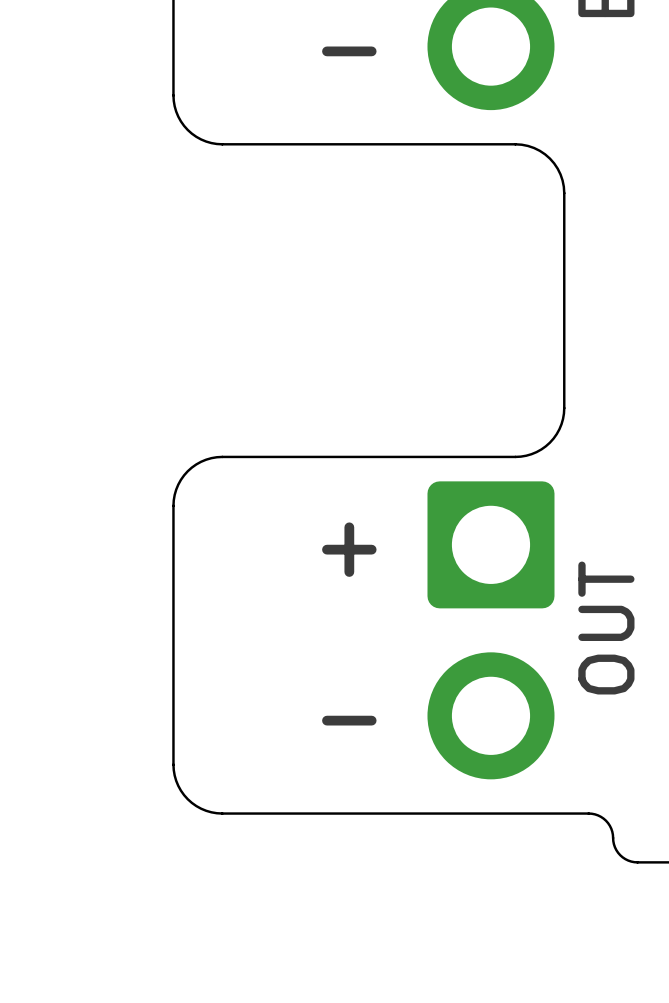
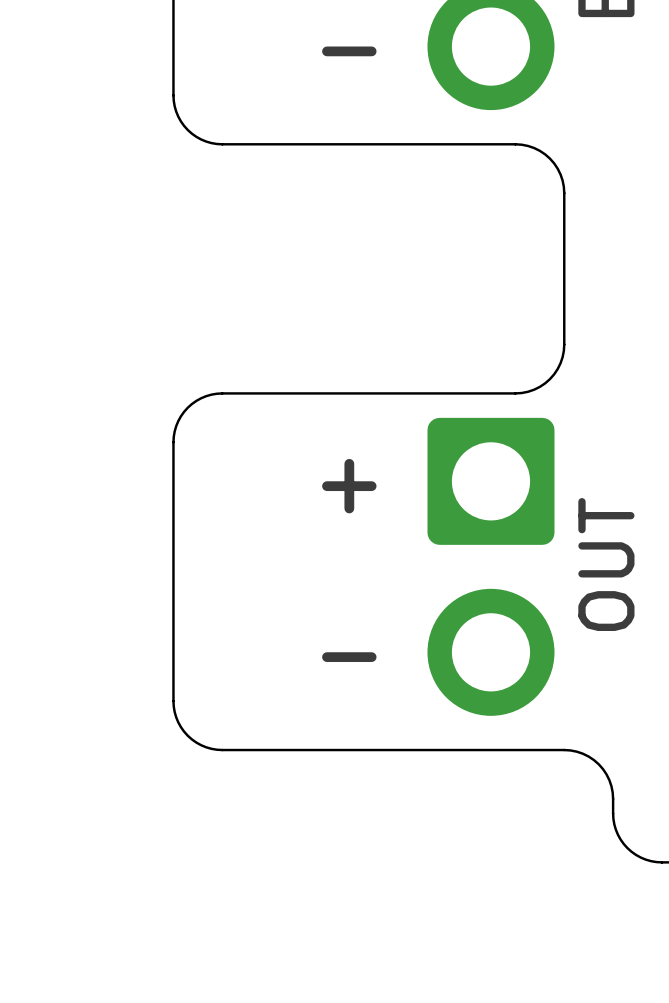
board edge: (564, 344) (564, 408) (561, 424) (549, 442) (531, 454) (515, 456) (216, 457) (201, 461) (184, 475) (176, 489) (173, 505) -> (564, 344) (560, 363) (549, 379) (539, 386) (521, 393) (222, 393) (206, 396) (187, 407) (176, 426) (173, 442) (173, 505)
text position: + (349, 549) -> + (349, 486)
text position: OUT (606, 628) -> OUT (606, 564)
part position: (490, 630) -> (490, 566)
board edge: (173, 701) (173, 764) (176, 780) (187, 799) (206, 810) (222, 813) (591, 813) (600, 816) (608, 823) (612, 831) (614, 847) (622, 857) (634, 862) (661, 862) -> (173, 701) (176, 717) (184, 731) (196, 742) (216, 749) (564, 750) (576, 751) (594, 760) (606, 774) (612, 792) (614, 824) (623, 843) (640, 857) (661, 862)
text position: - (349, 720) -> - (349, 657)

